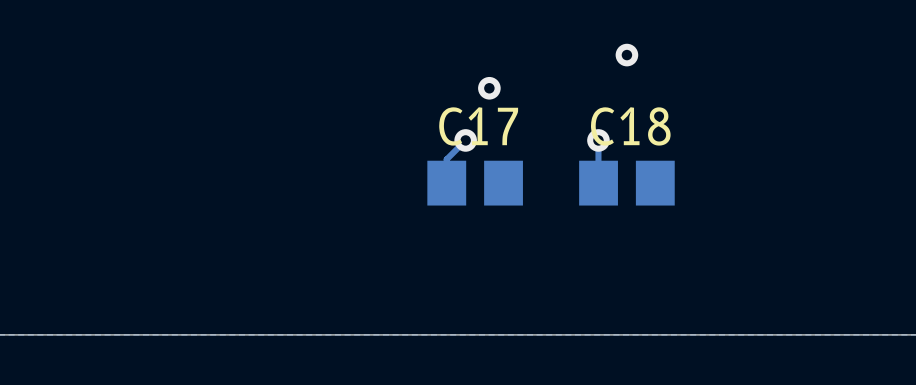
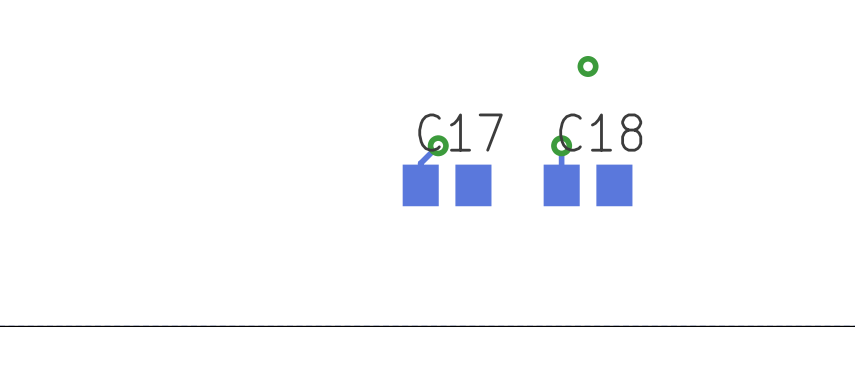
via: (489, 88) -> none

